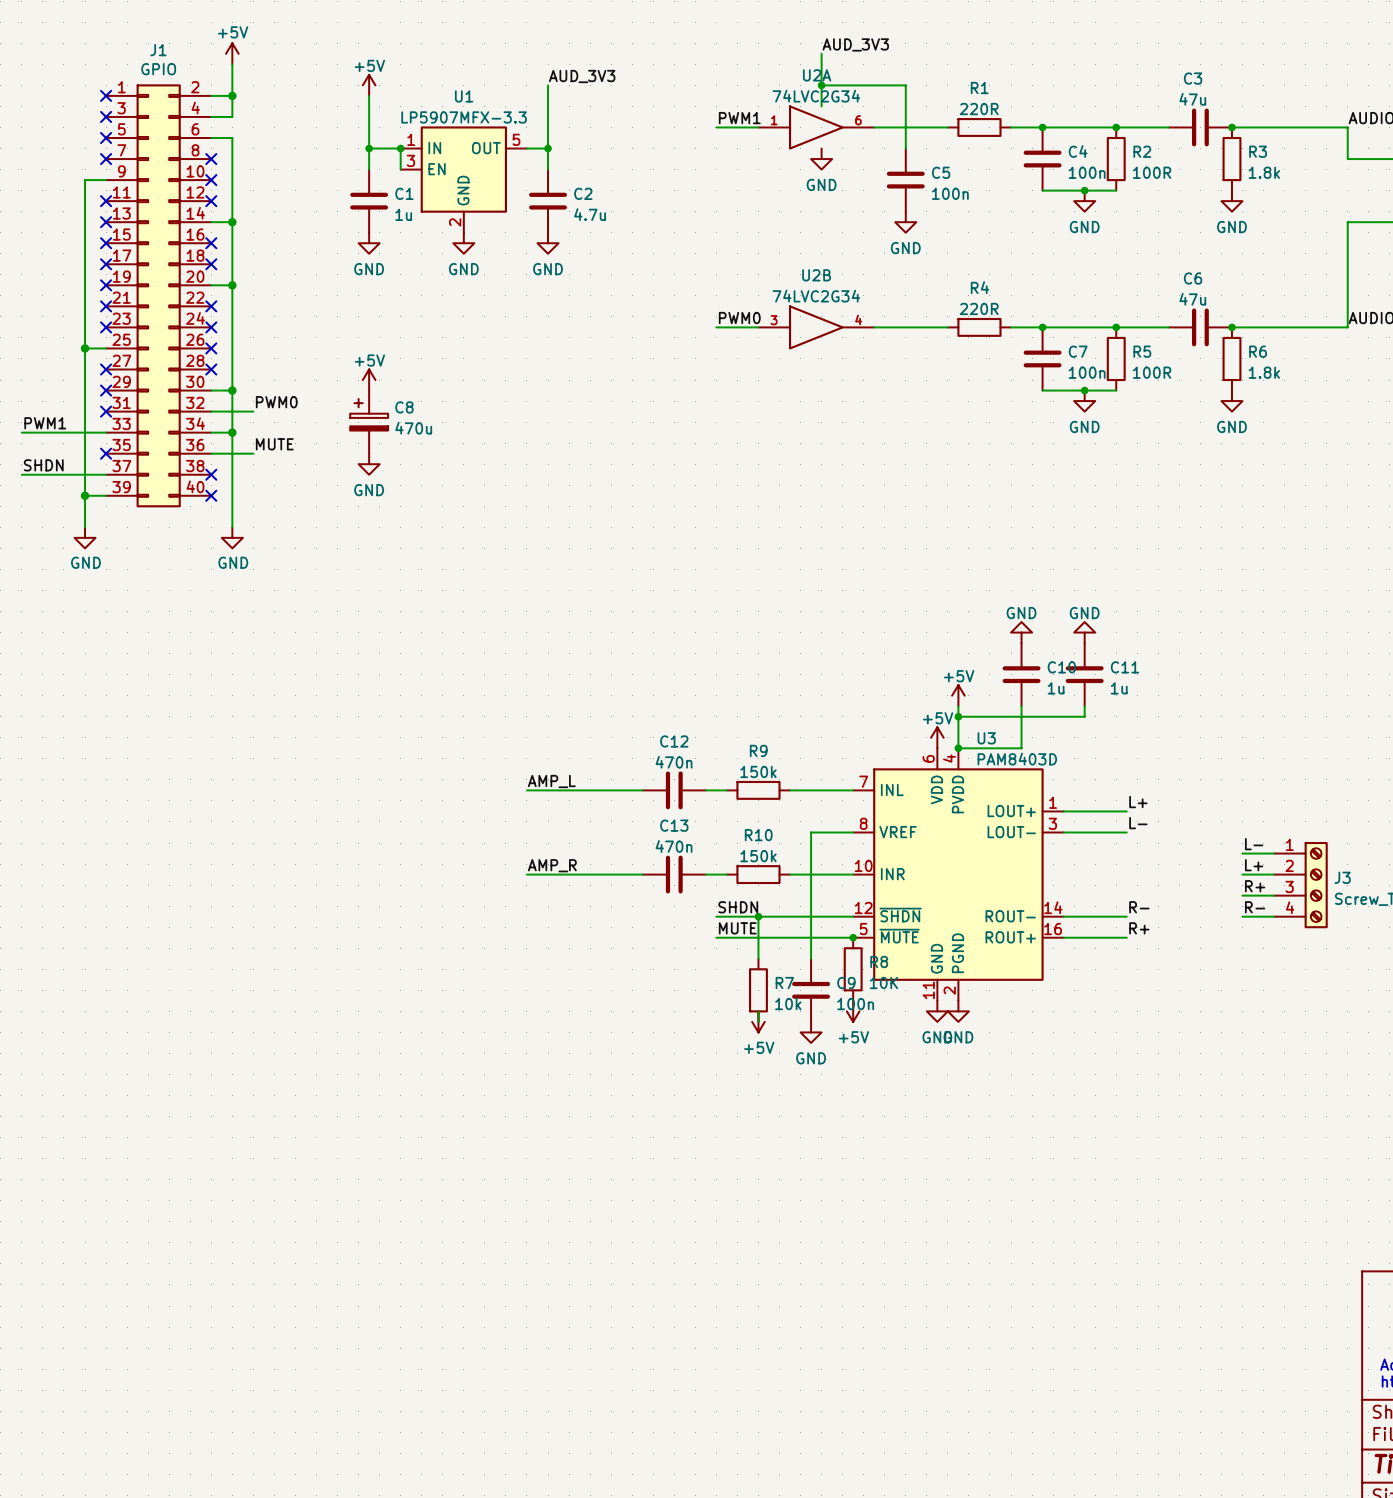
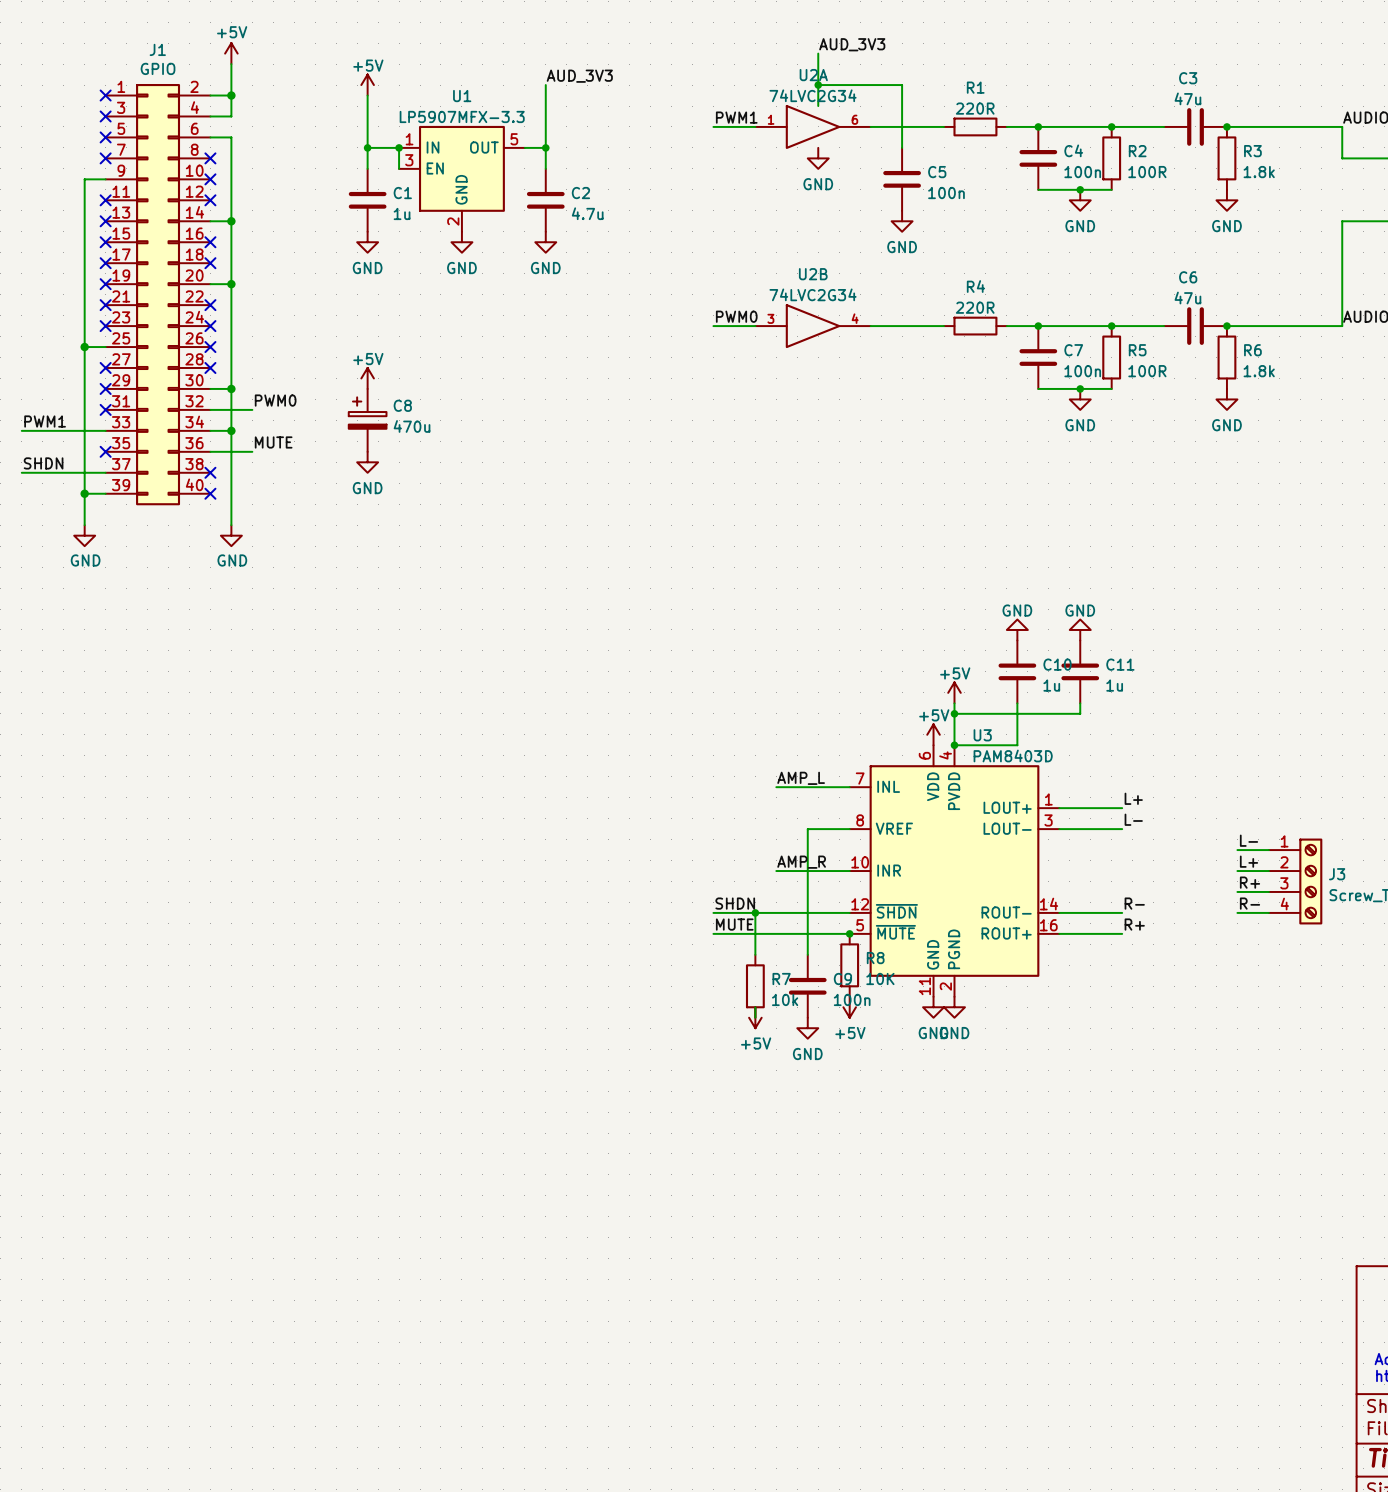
label: AMP_L (551, 781) -> none
label: none -> AMP_L (801, 778)
wire: (526, 790) (642, 790) -> none
C12: 470n (674, 790) -> none
wire: (705, 790) (726, 790) -> none
R9: 150k (758, 790) -> none
label: AMP_R (552, 865) -> none
label: none -> AMP_R (801, 862)
wire: (526, 874) (642, 874) -> none
C13: 470n (674, 874) -> none
wire: (705, 874) (726, 874) -> none
R10: 150k (758, 874) -> none

